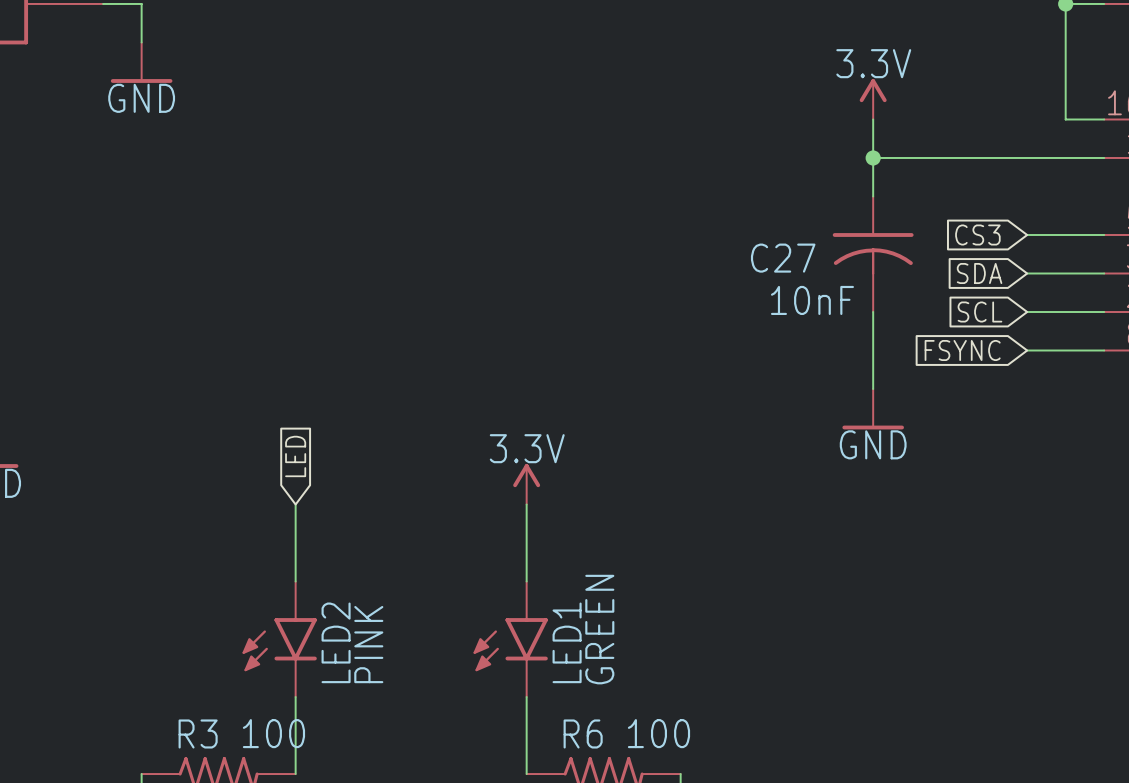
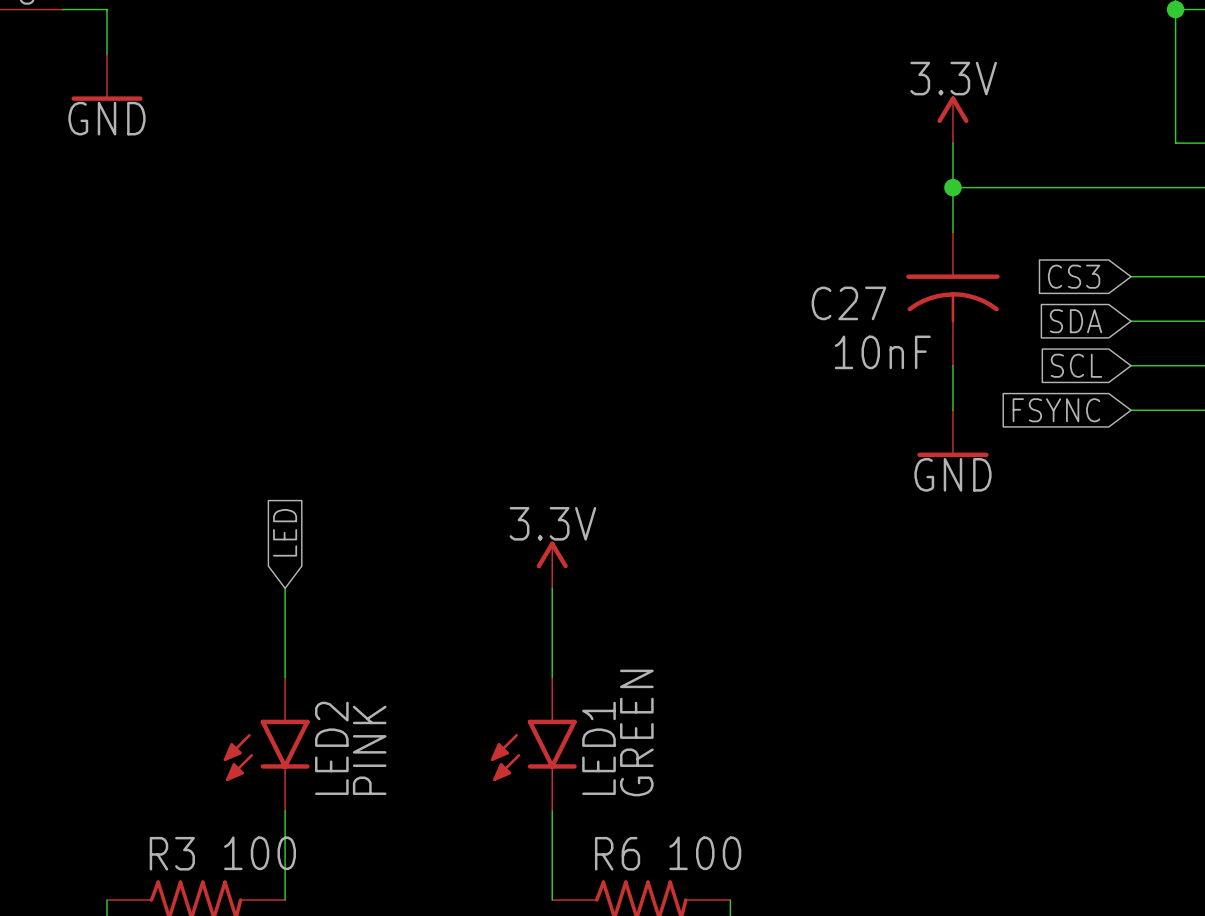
power symbol position: GND (873, 409) -> GND (952, 433)

